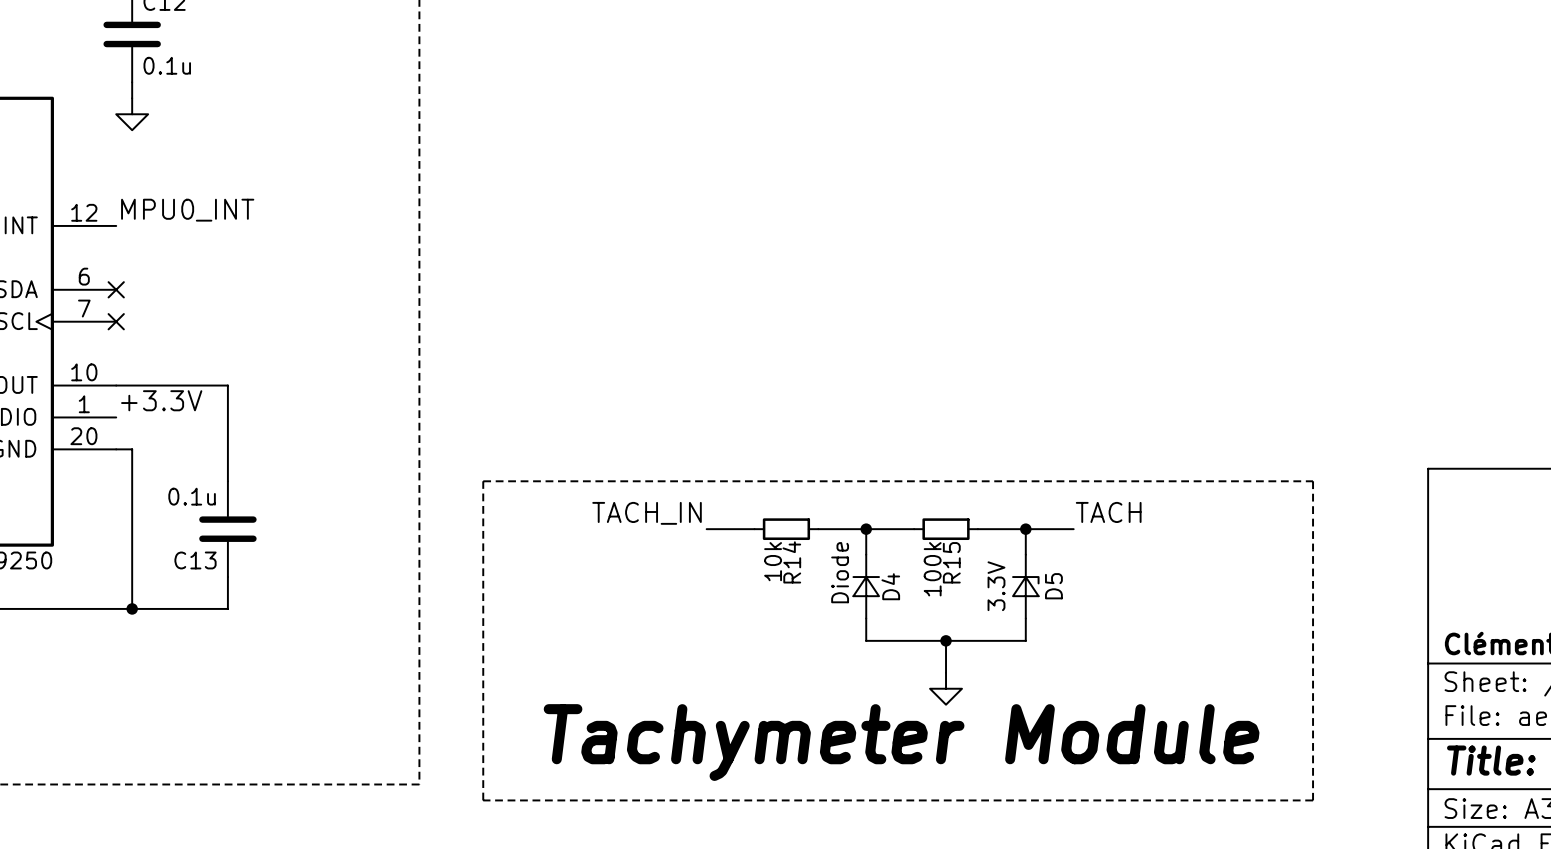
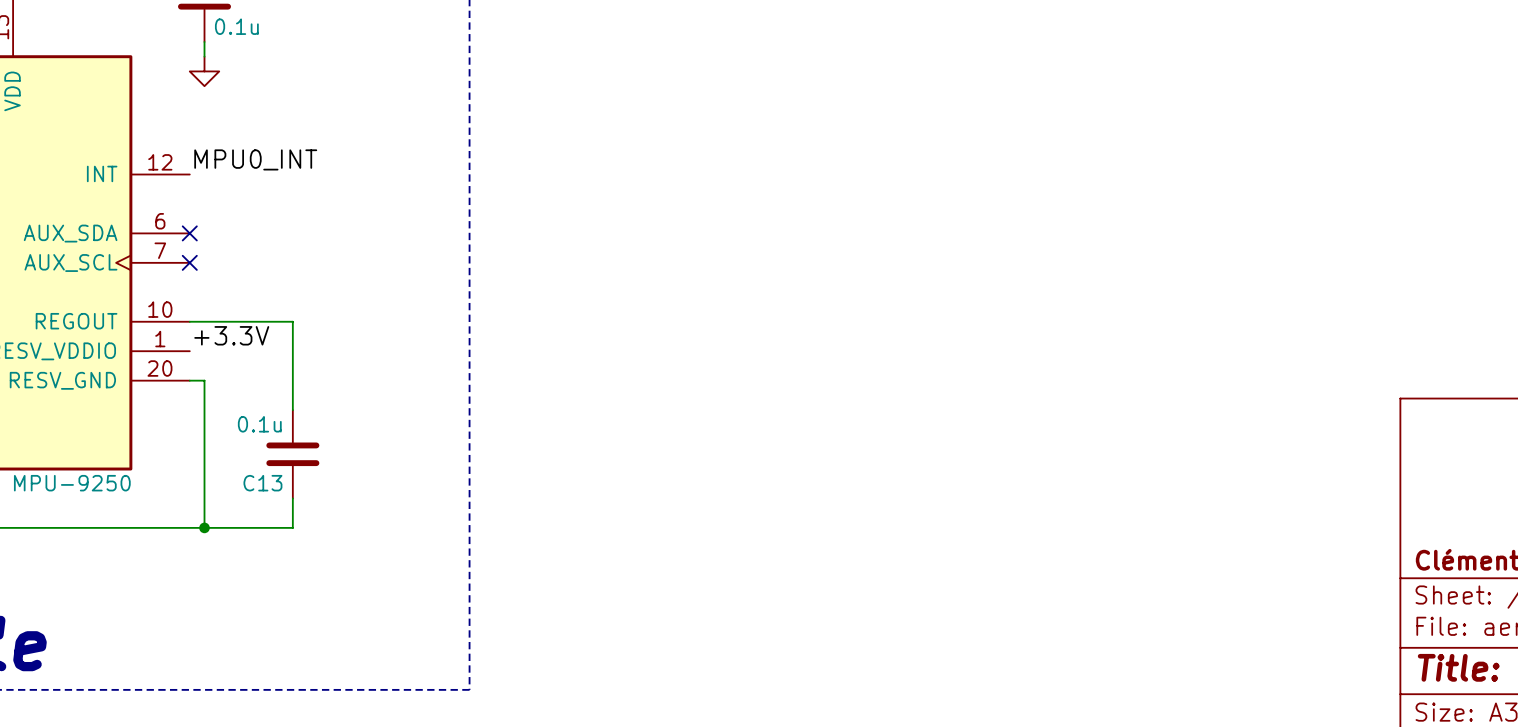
line: (483, 481) (1313, 481) (1313, 800) (483, 800) (483, 481) -> none
label: TACH (1108, 512) -> none
label: TACH_IN (647, 513) -> none
wire: (706, 529) (754, 529) -> none
R14: 10k (786, 529) -> none
wire: (818, 529) (914, 529) -> none
wire: (866, 529) (866, 554) -> none
junction: (866, 529) -> none
R15: 100k (946, 529) -> none
wire: (977, 529) (1073, 529) -> none
wire: (1025, 529) (1025, 554) -> none
junction: (1025, 529) -> none
D4: Diode (866, 586) -> none
D5: 3.3V (1025, 586) -> none
wire: (866, 618) (866, 640) (1025, 640) (1025, 618) -> none
wire: (946, 640) (946, 672) -> none
junction: (946, 640) -> none
power symbol: (946, 688) -> none
text: Tachymeter Module (901, 742) -> none

